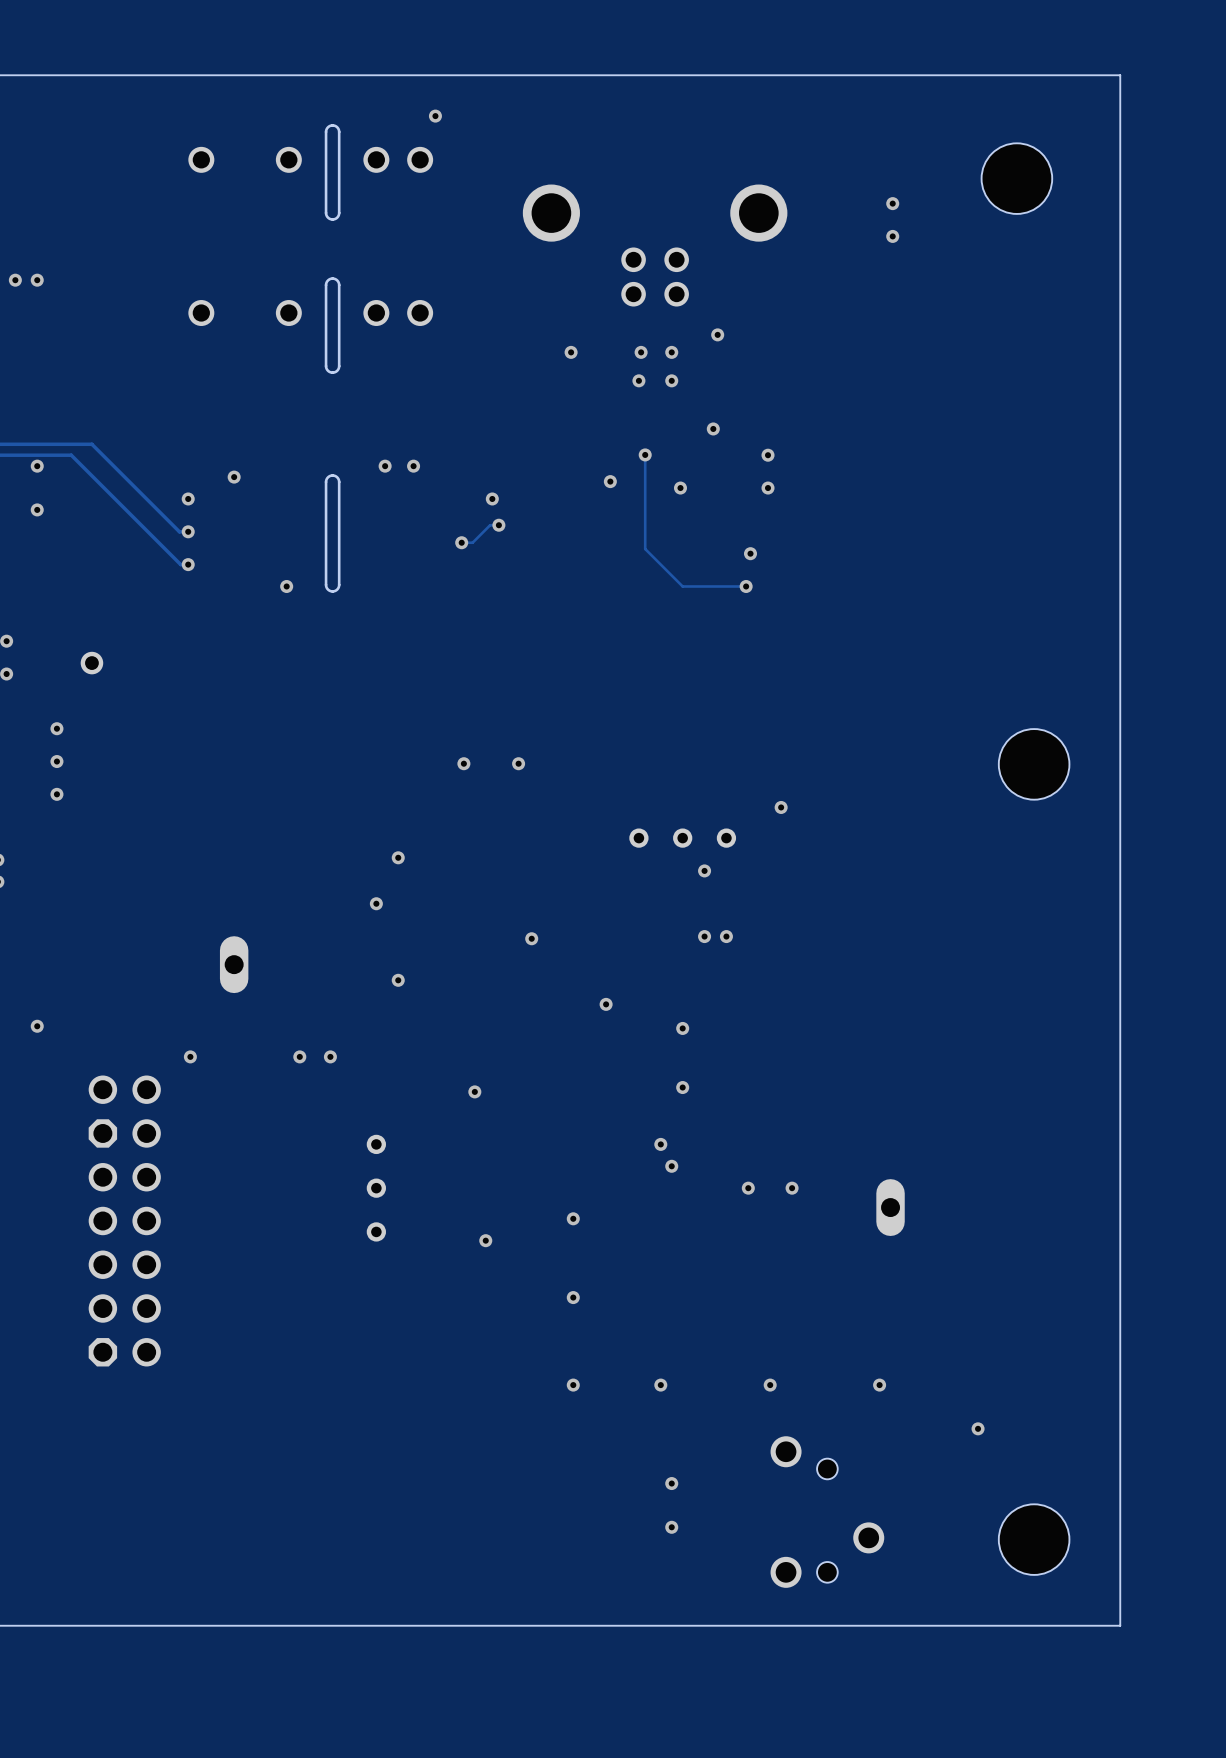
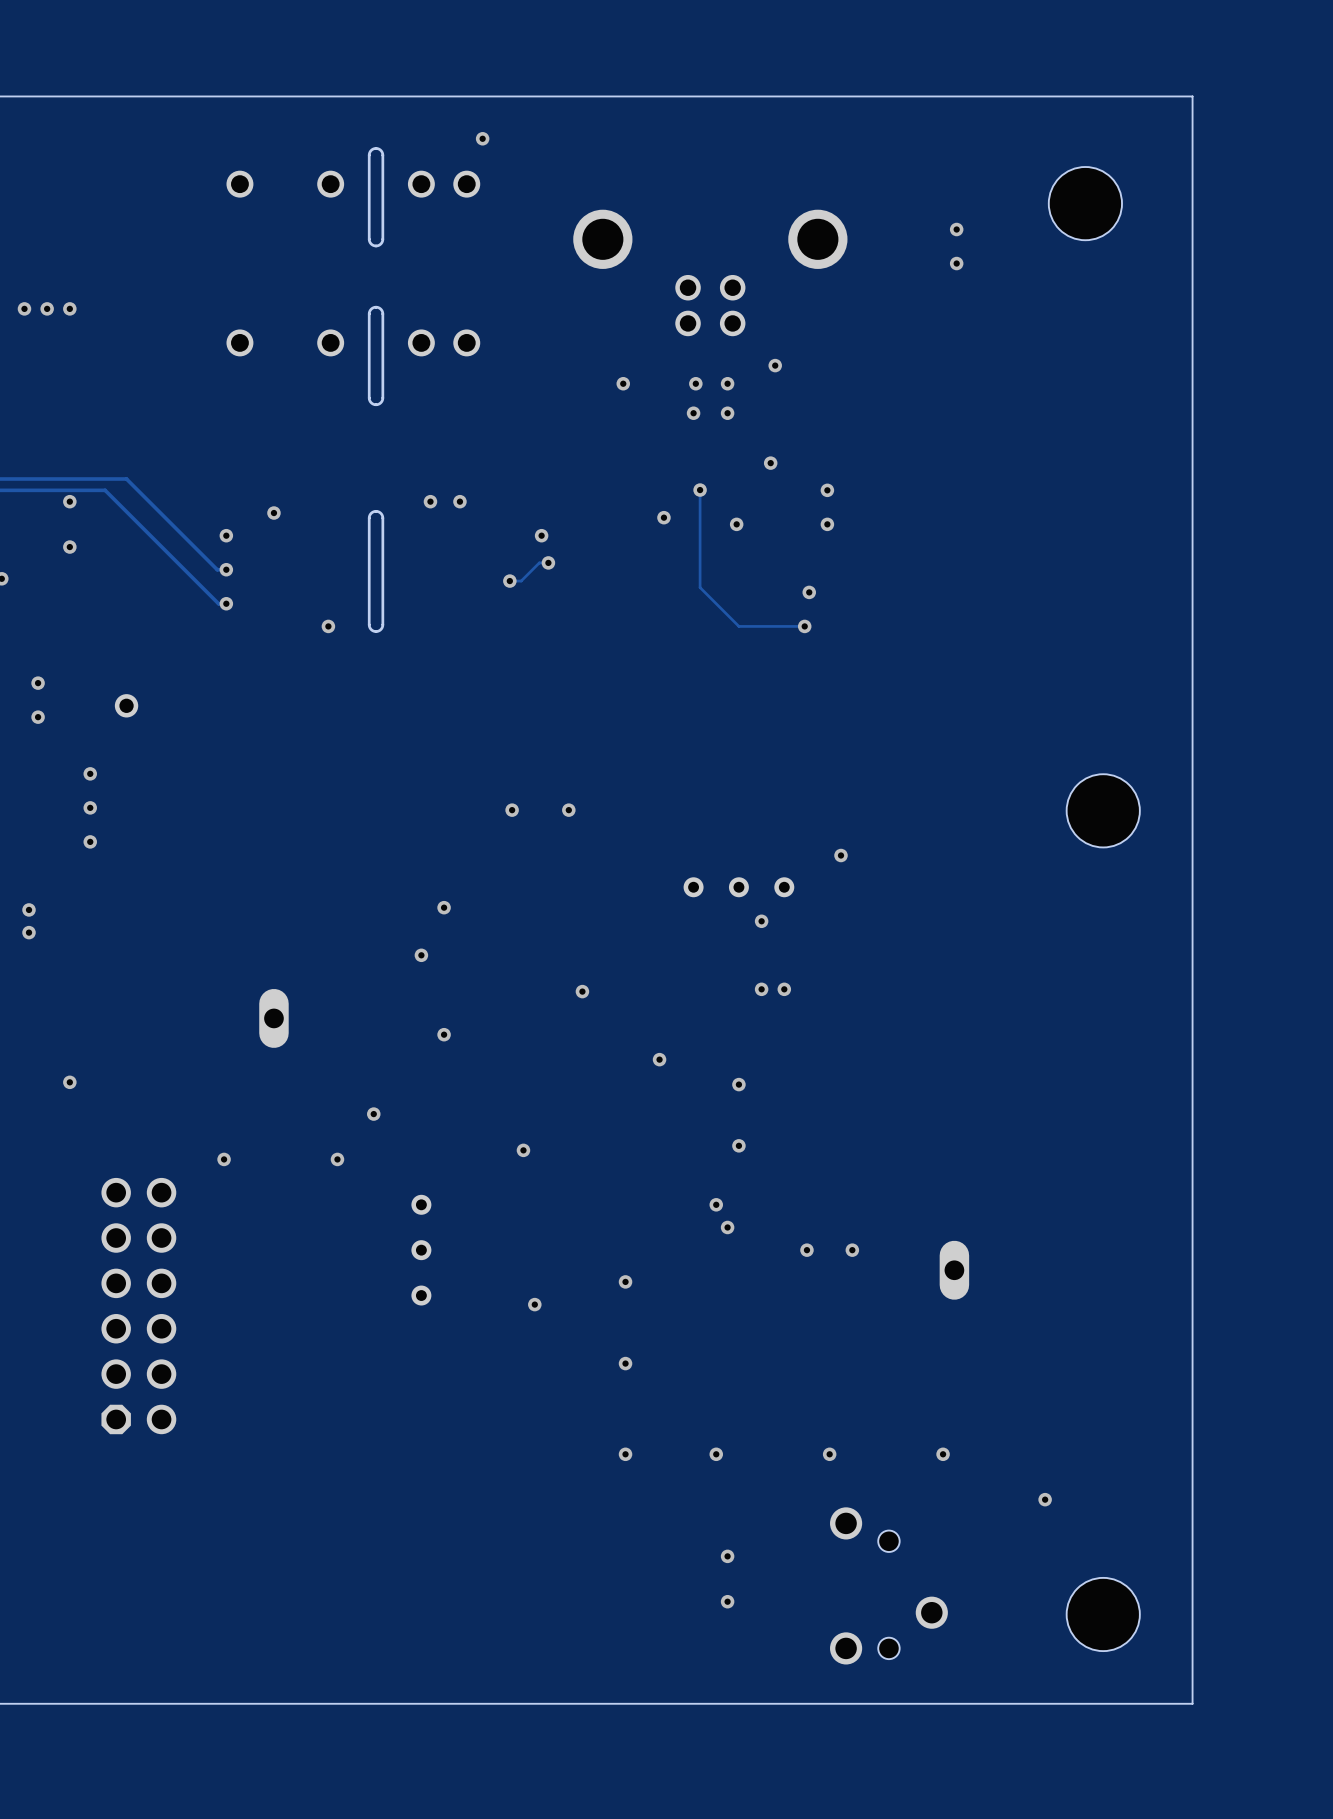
via position: (190, 1056) -> (224, 1159)
via position: (299, 1056) -> (337, 1159)
part: (124, 1220) -> none
part: none -> (138, 1306)

